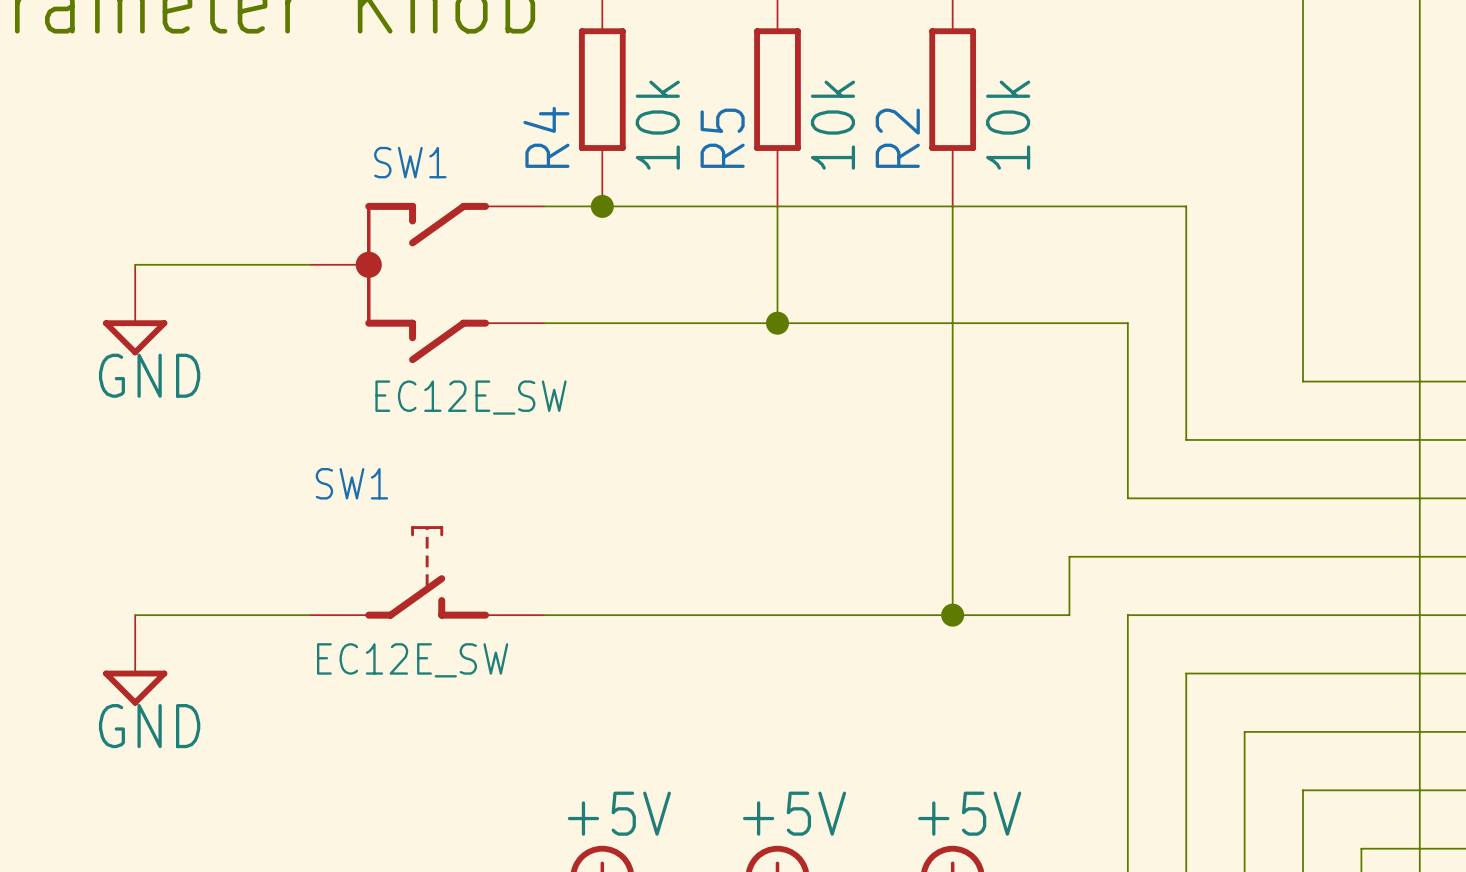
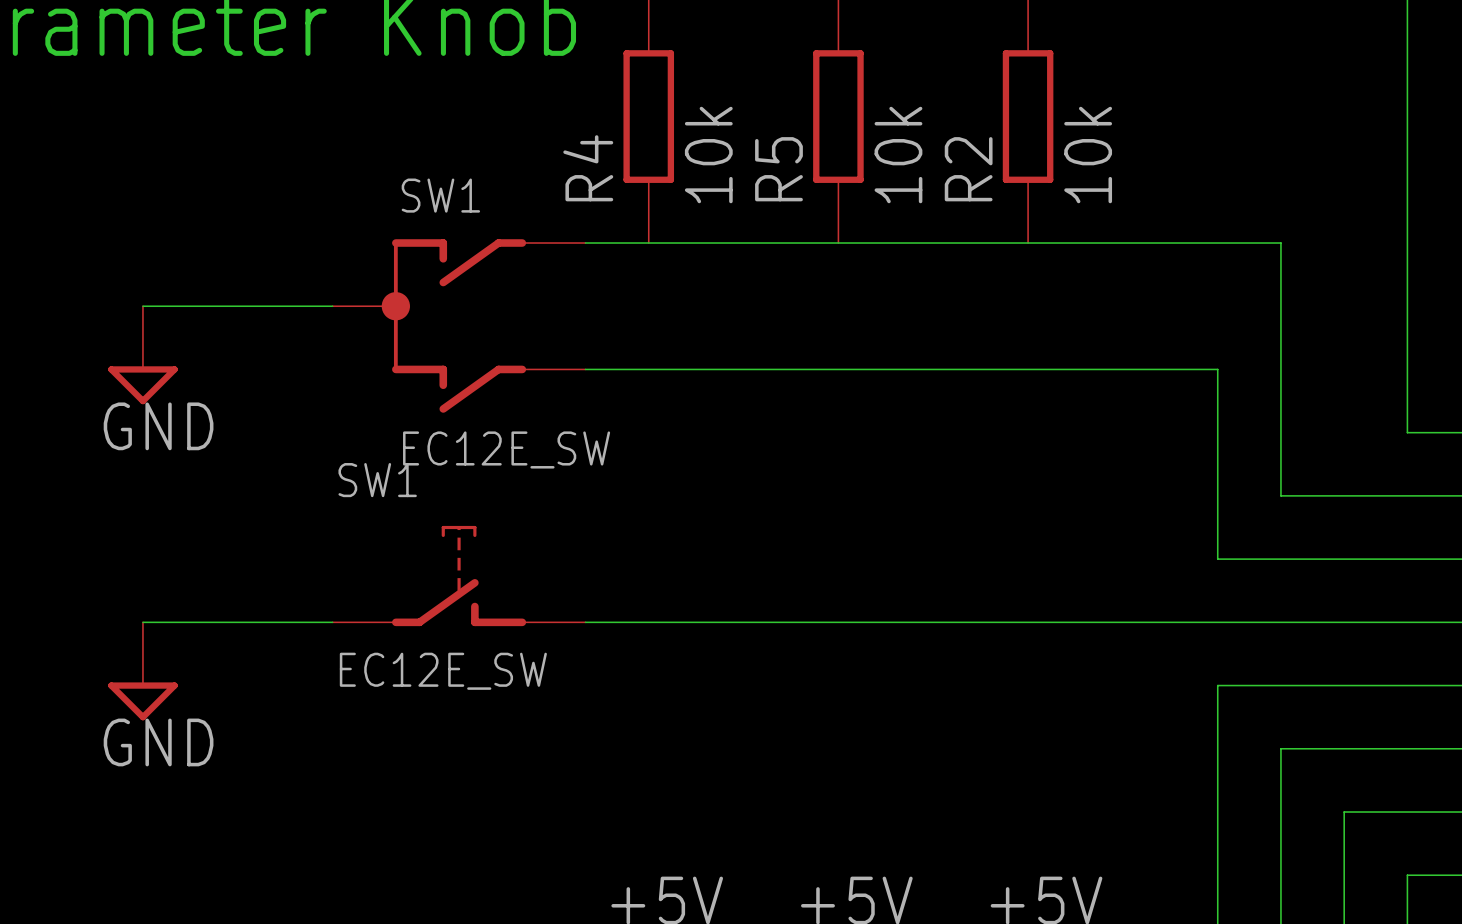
junction: (602, 206) -> none
wire: (777, 206) (777, 323) -> none
wire: (952, 206) (952, 615) -> none
junction: (777, 323) -> none
wire: (1069, 556) (1069, 615) (543, 615) -> (1154, 622) (585, 622)
SW1 position: (427, 572) -> (459, 576)
wire: (135, 615) (310, 615) -> (142, 622) (332, 622)
junction: (952, 615) -> none
power symbol position: GND (135, 660) -> GND (142, 671)

